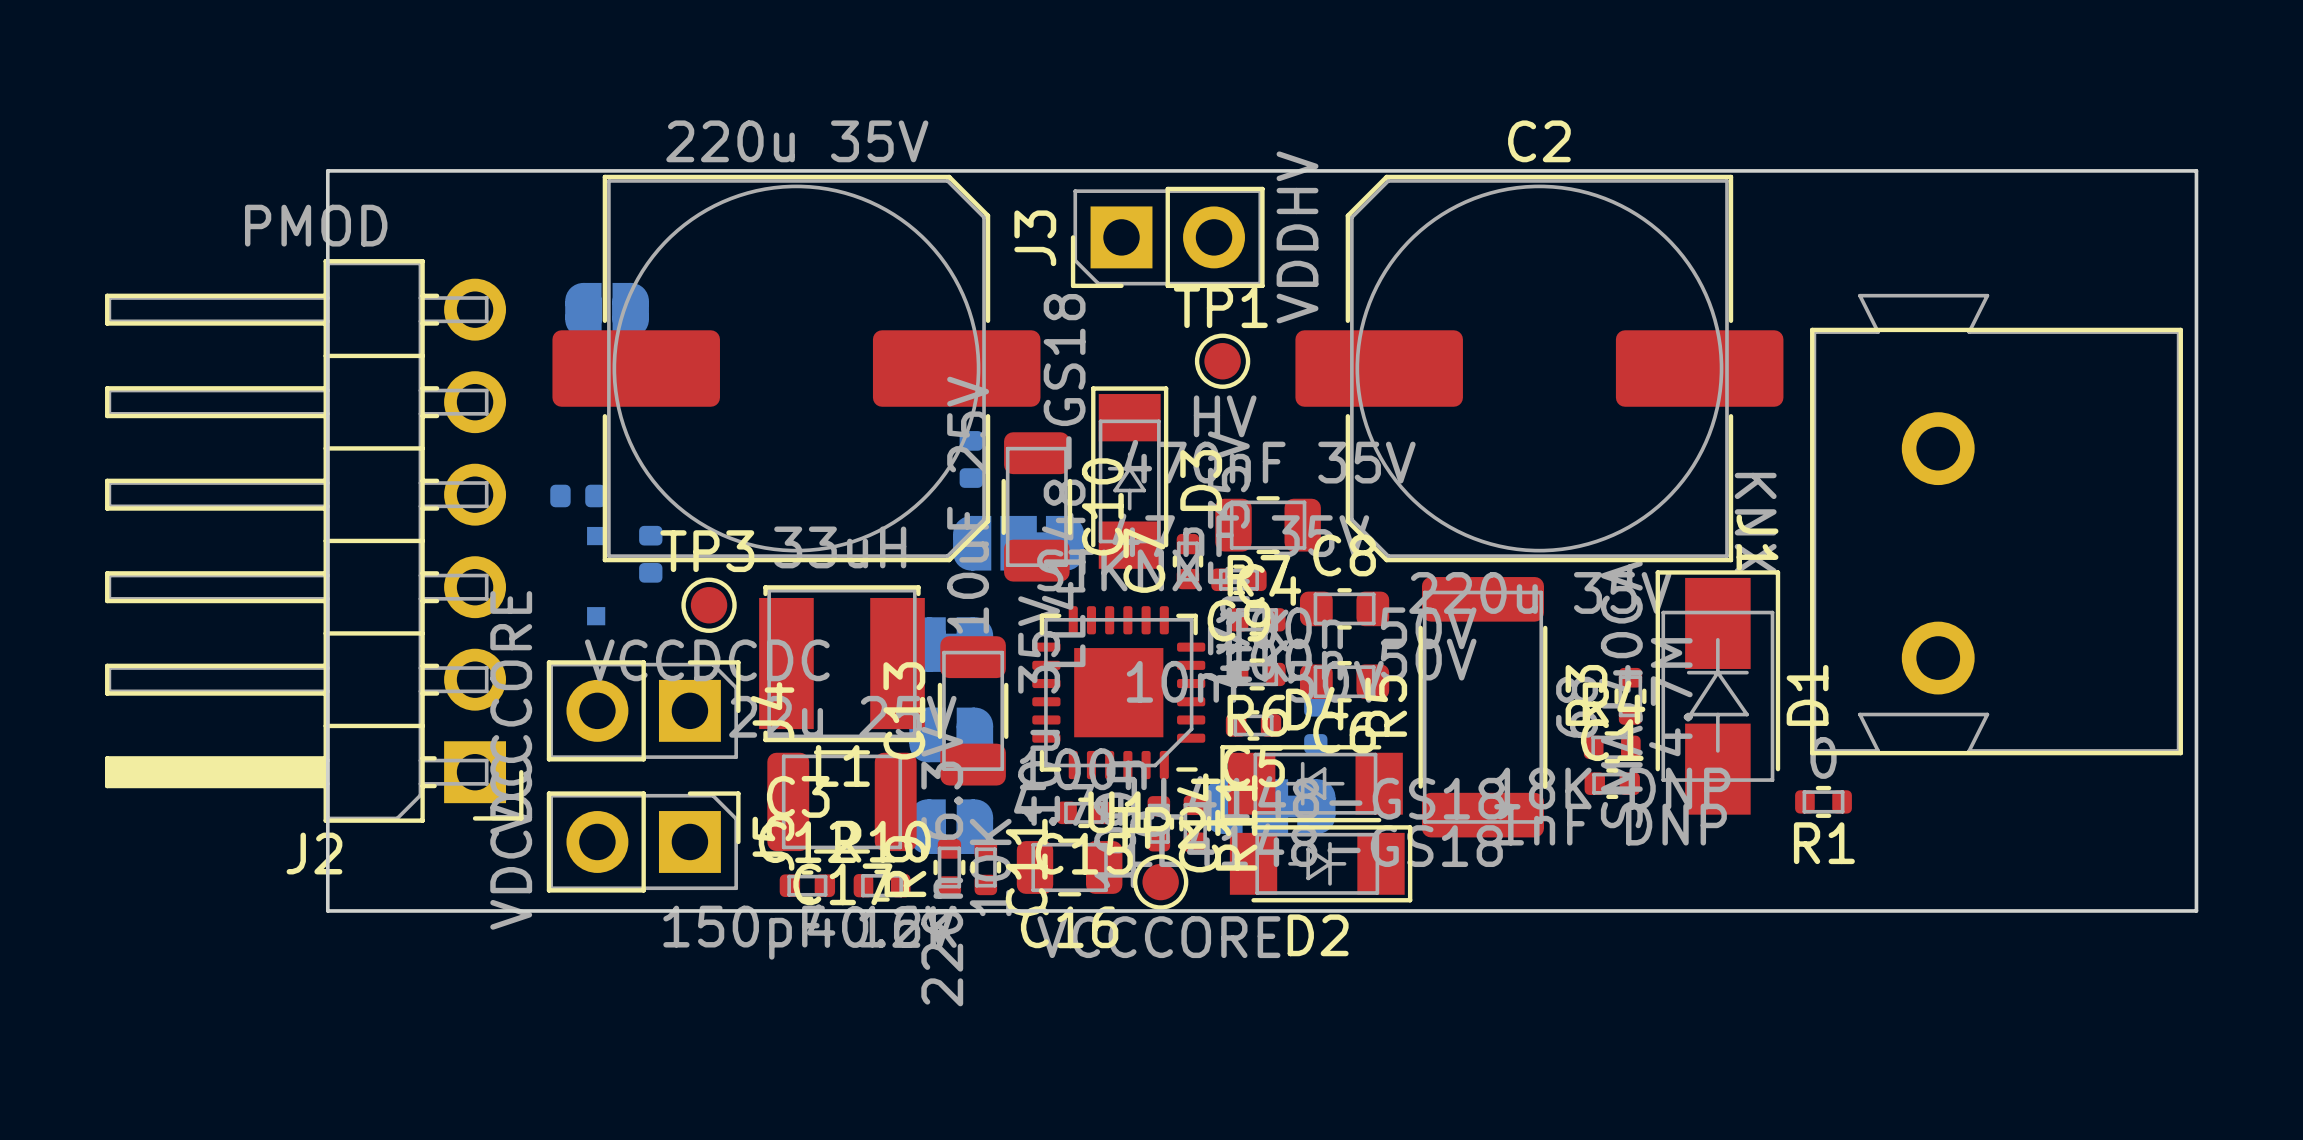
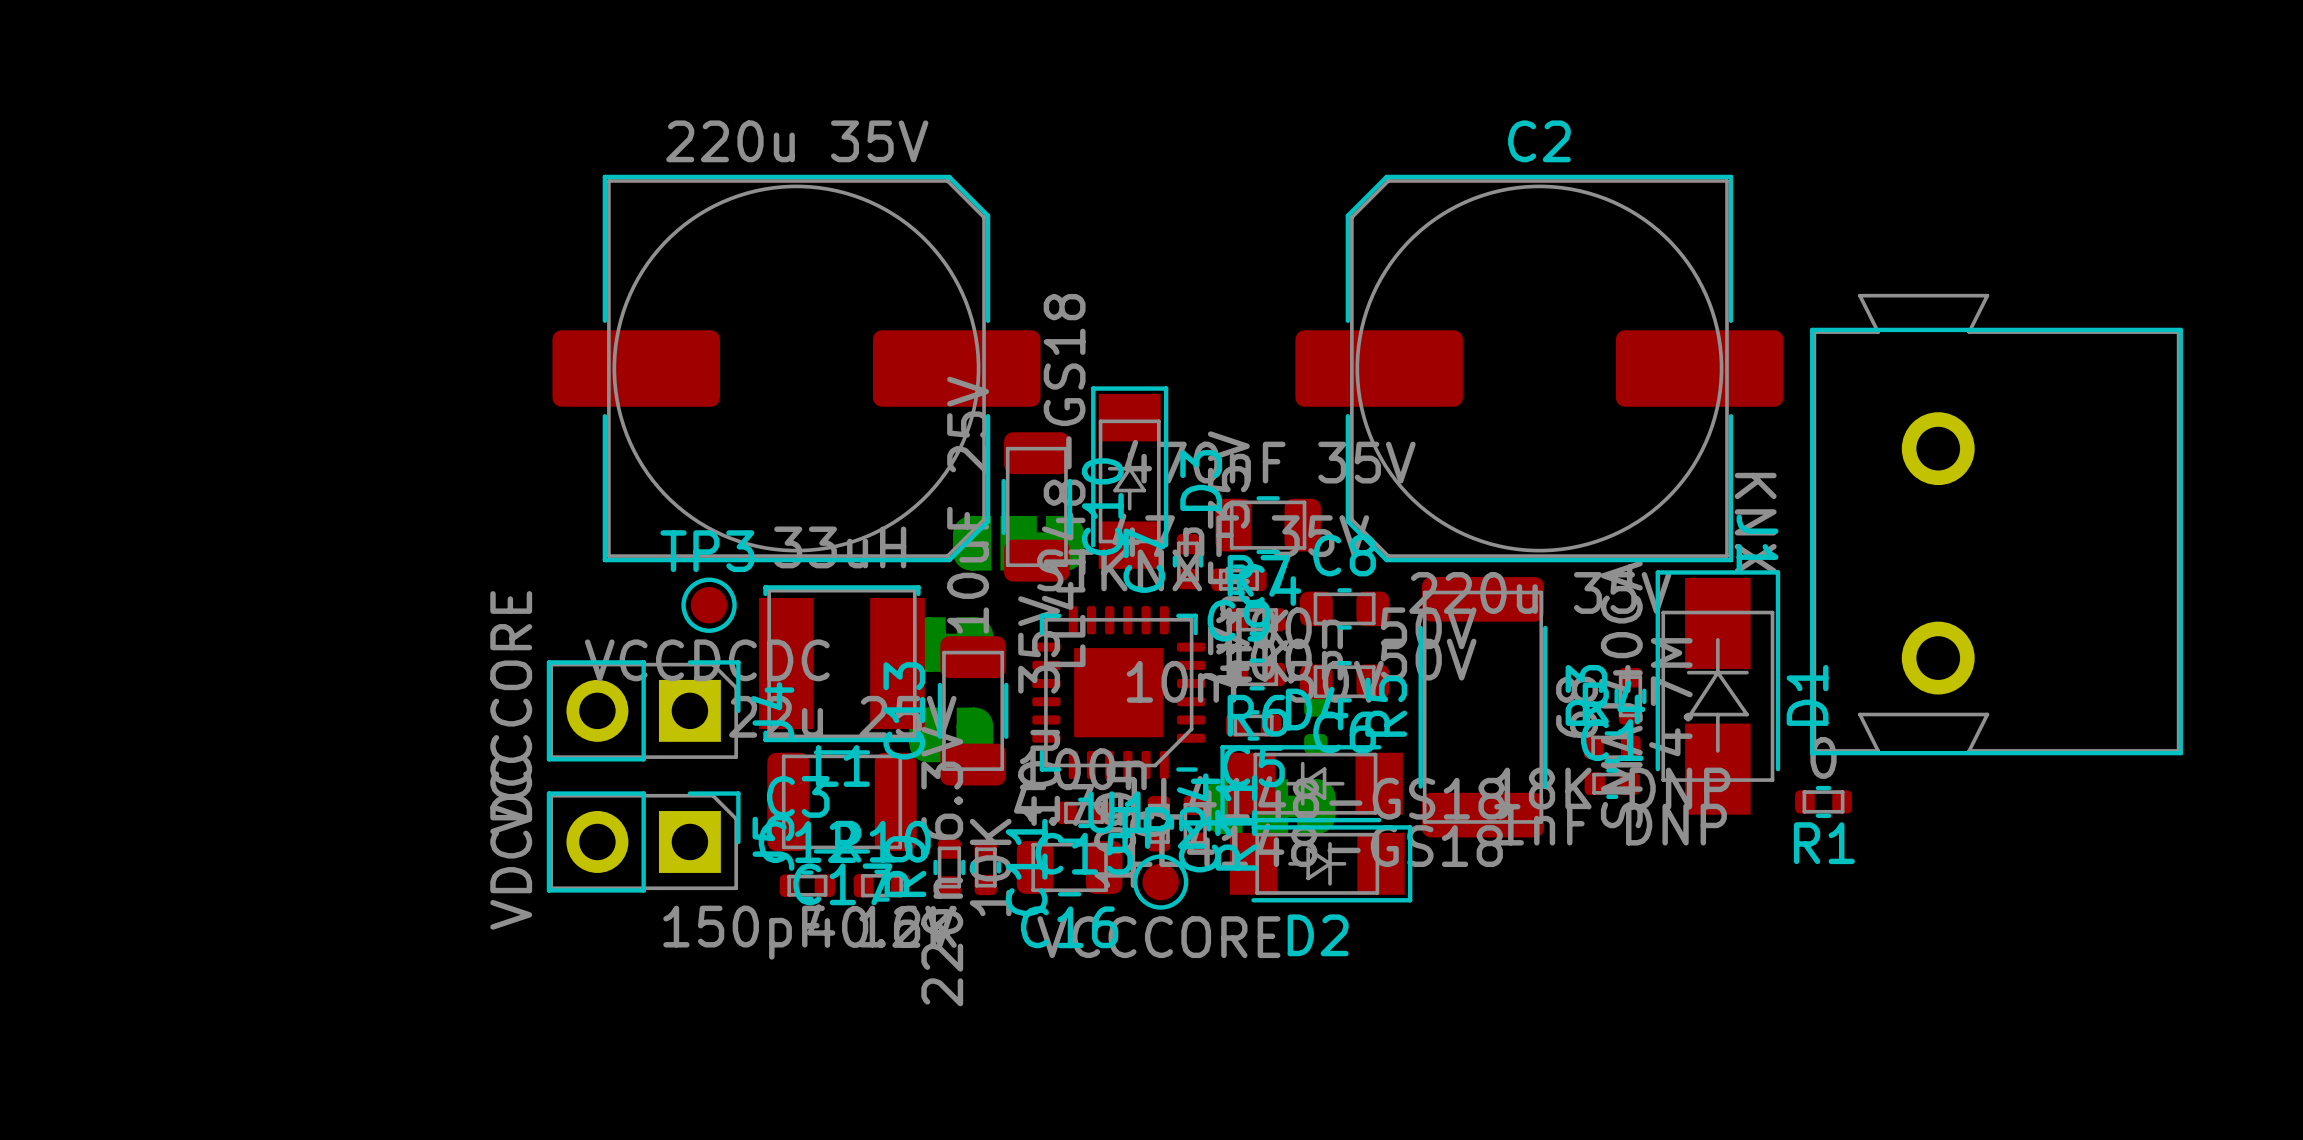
board edge: (327, 170) (2196, 170) (2196, 910) (327, 910) (327, 170) -> none
J3: VDDHV (1167, 237) -> none
part: (607, 310) -> none
TP1: HV (1222, 361) -> none
part: (971, 459) -> none
part: (577, 495) -> none
J2: PMOD (314, 540) -> none
part: (650, 554) -> none
part: (596, 576) -> none
part: (951, 826) -> none

